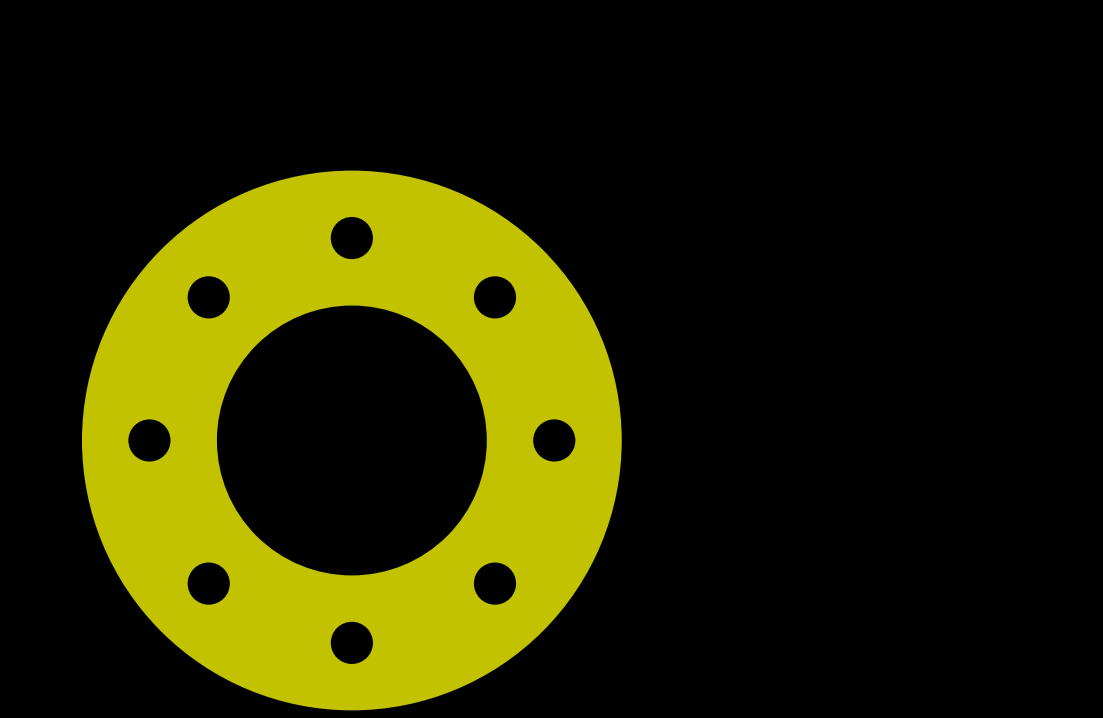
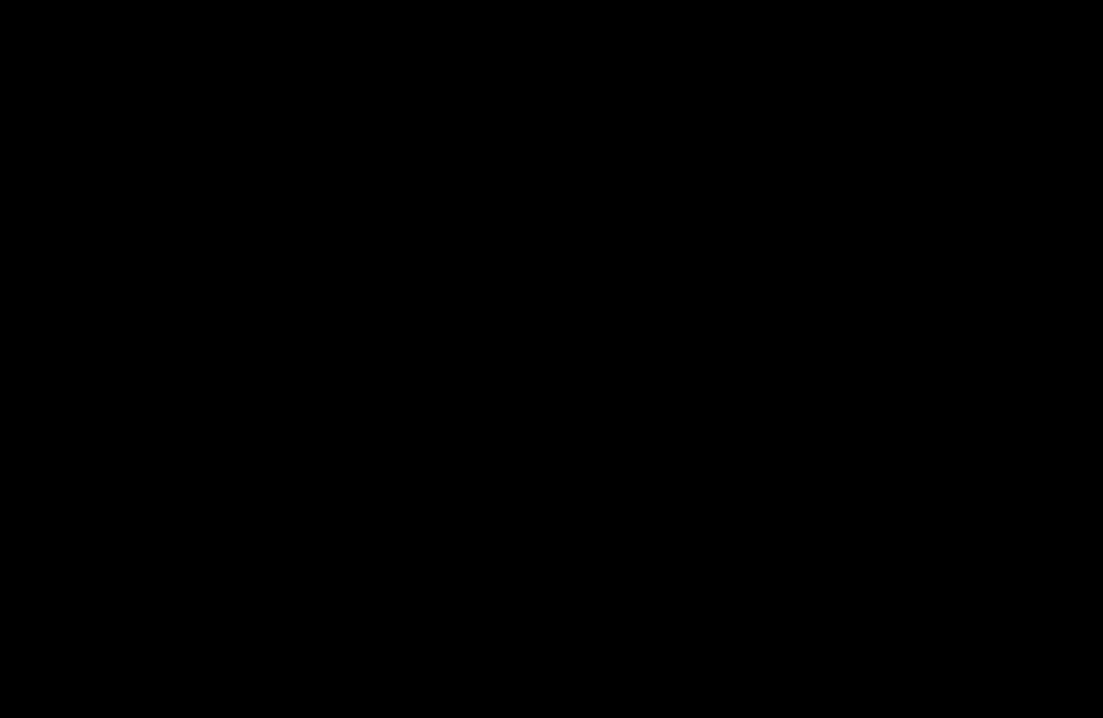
part: (351, 440) -> none

